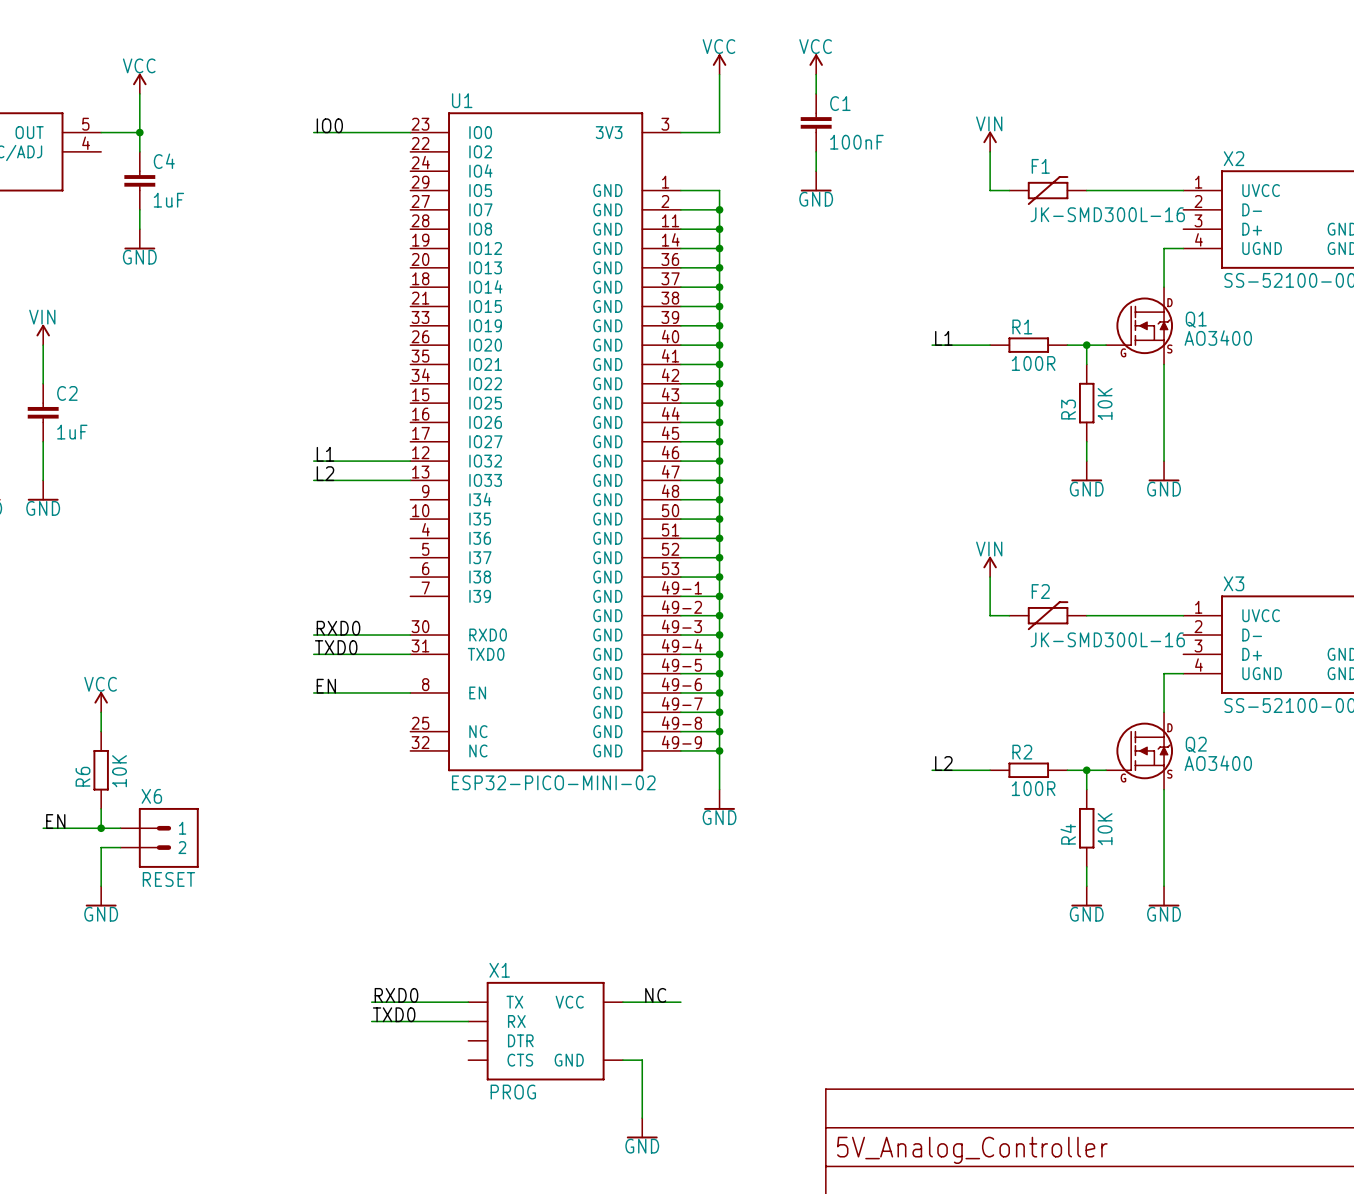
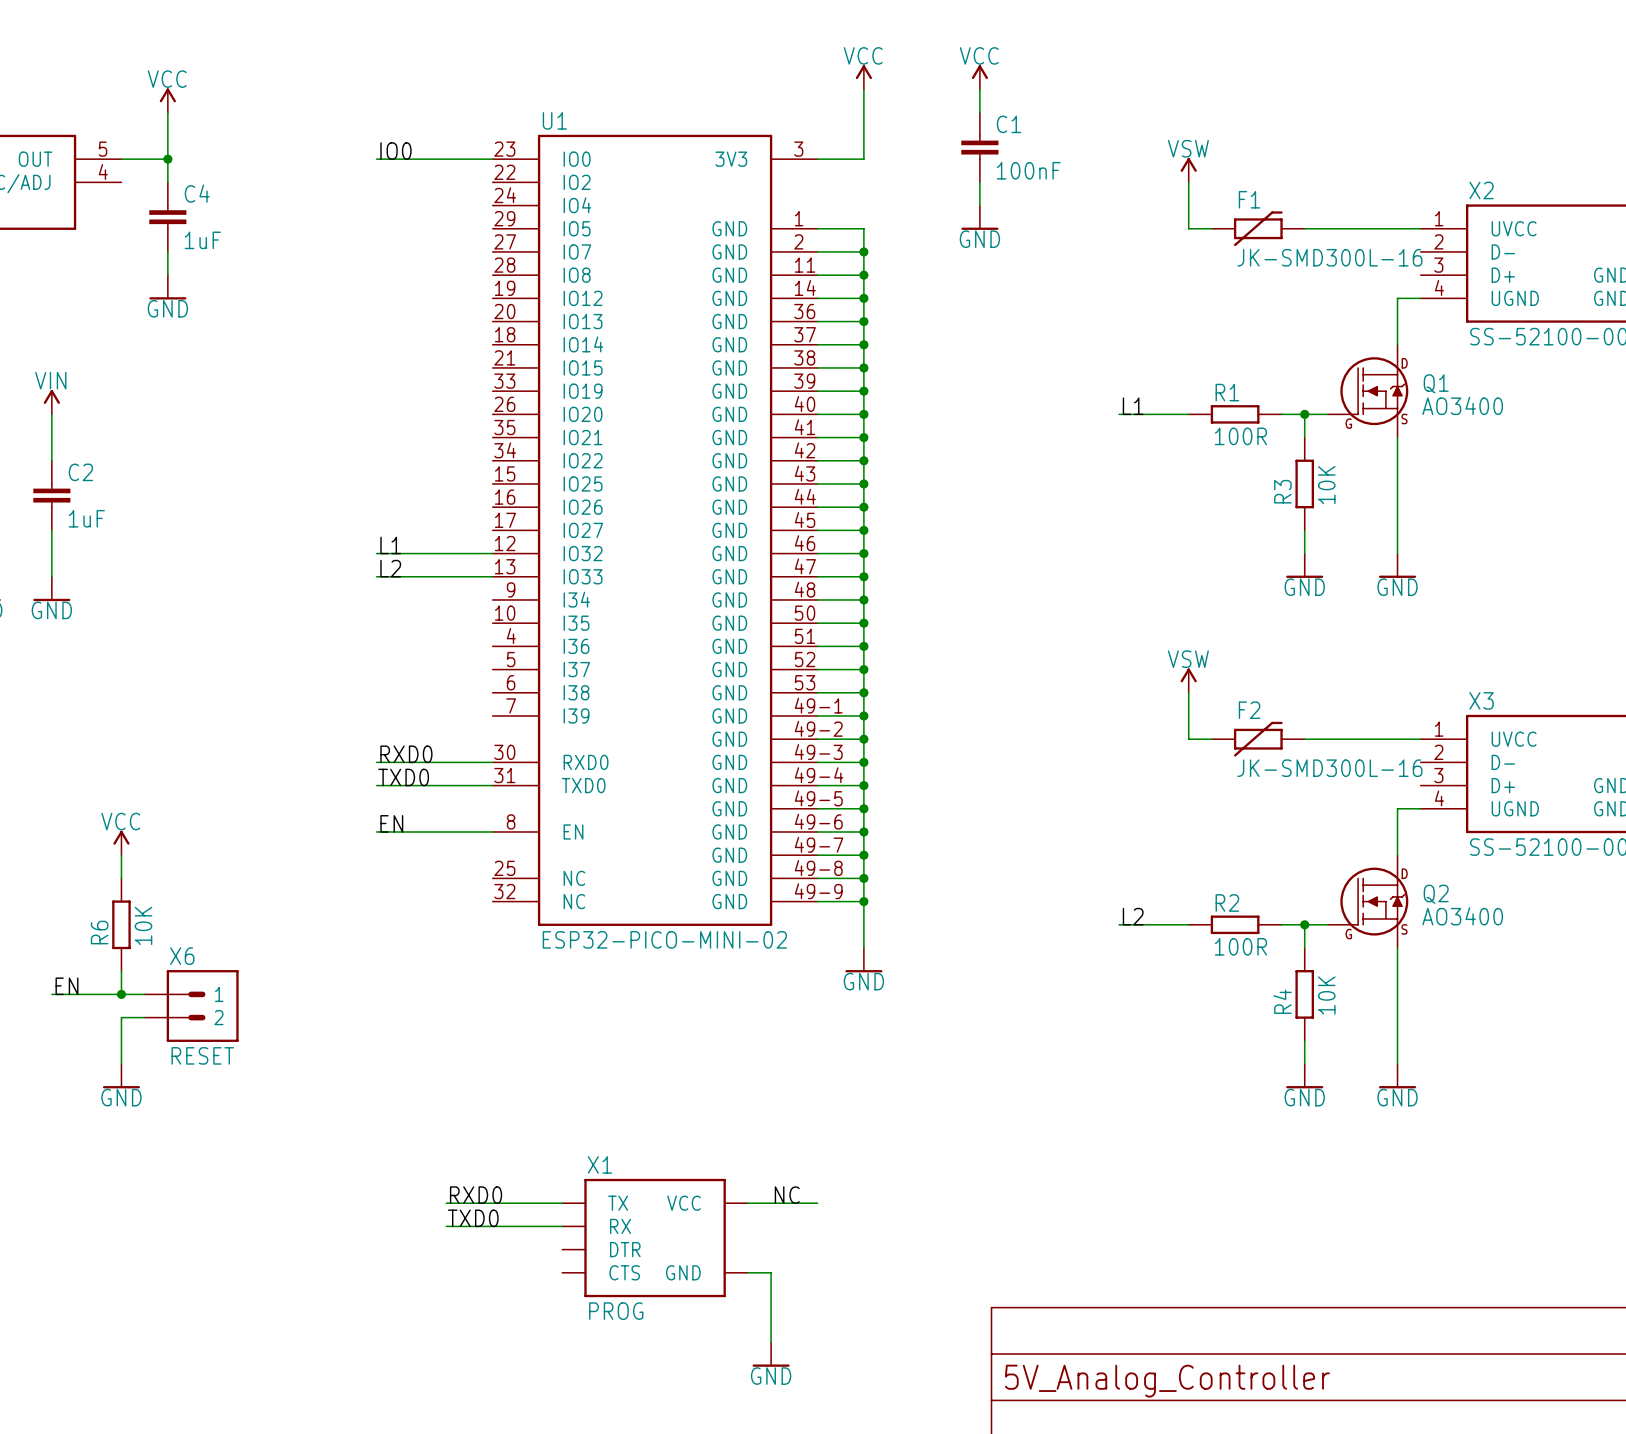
power symbol: VIN (990, 141) -> VSW (1188, 170)
power symbol: VIN (990, 566) -> VSW (1188, 680)

